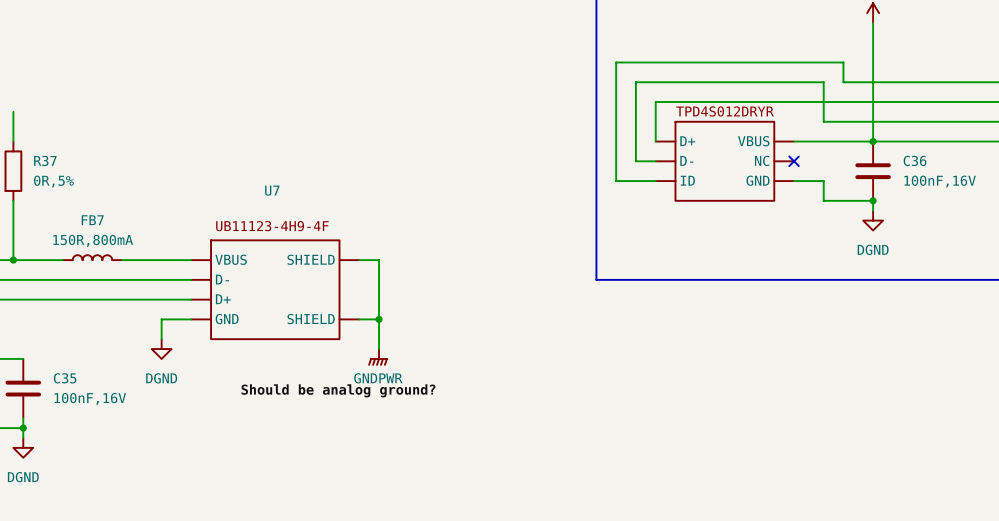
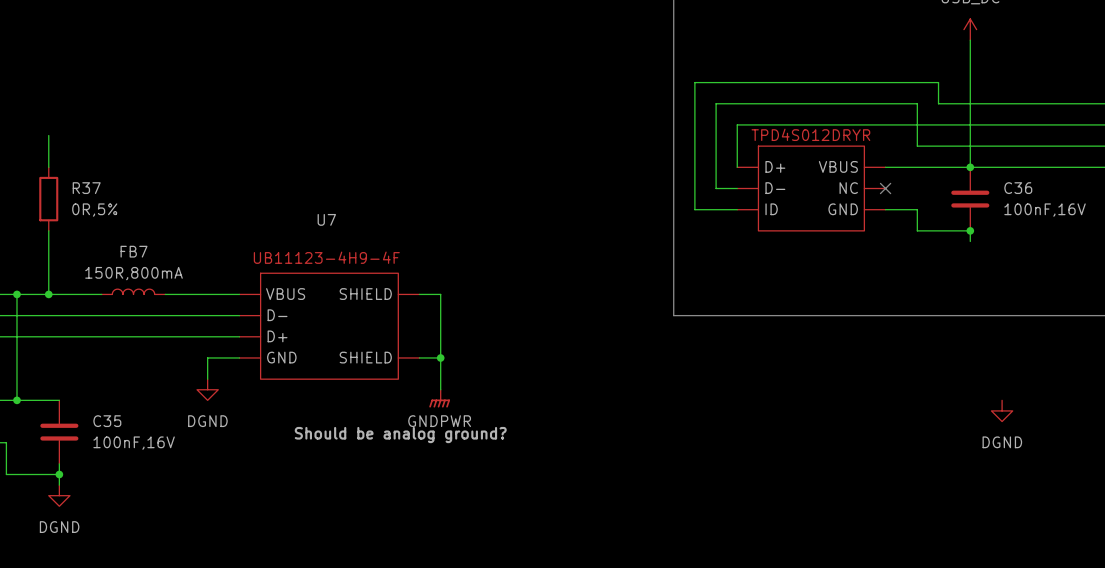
power symbol: DGND (873, 220) -> none
power symbol: none -> DGND (1002, 410)

